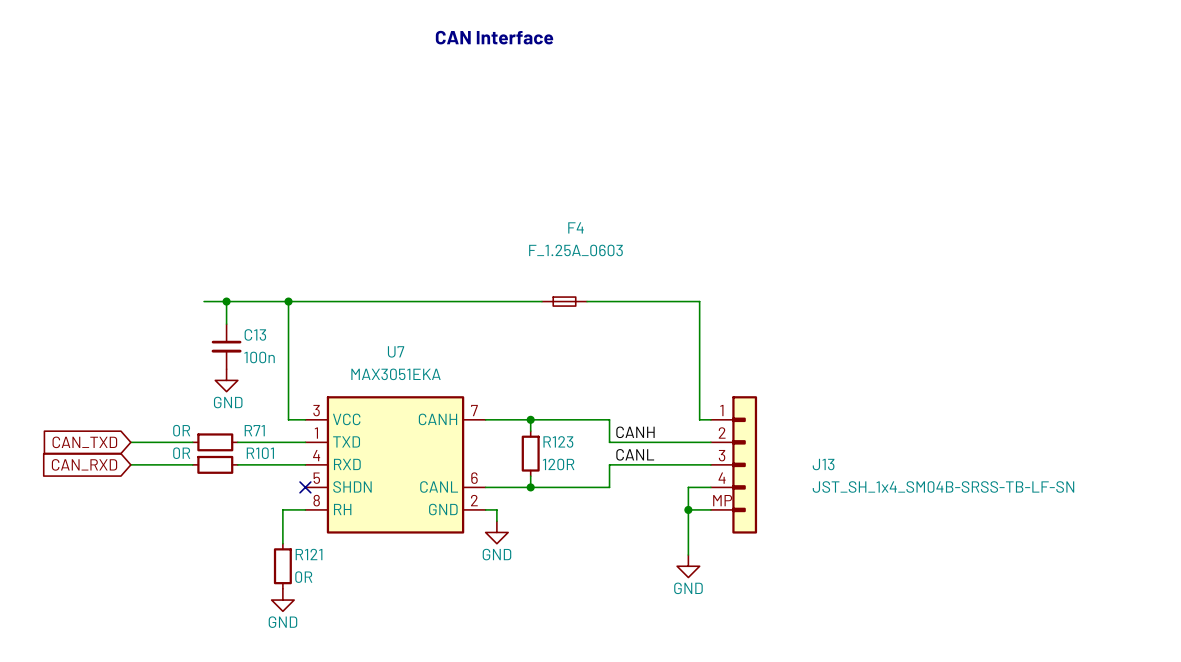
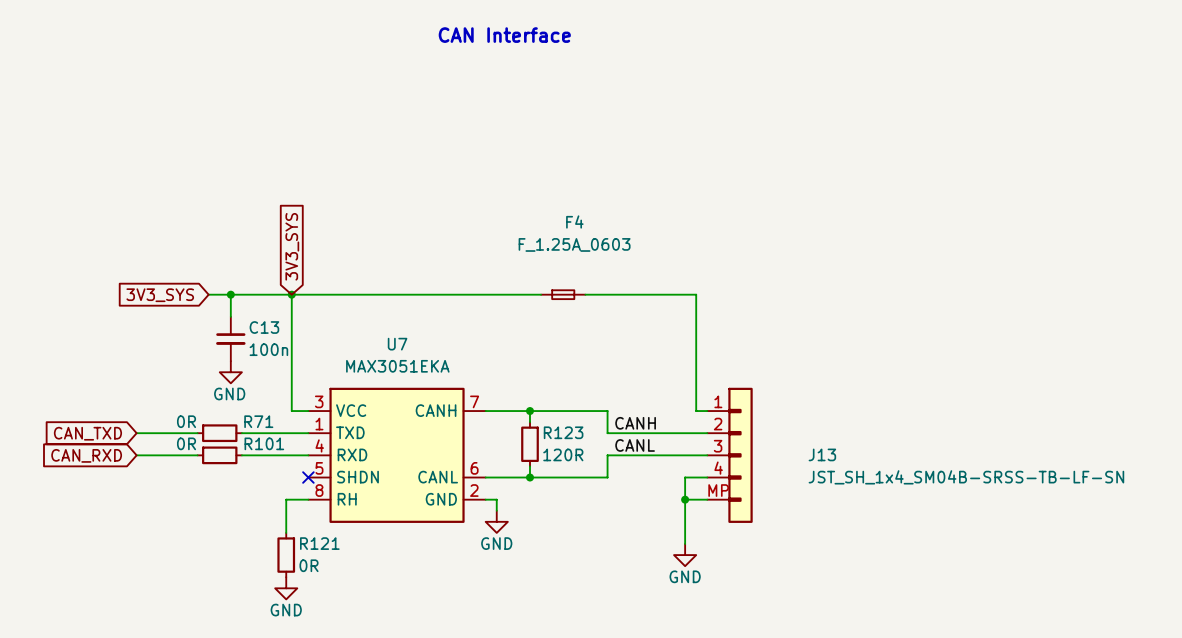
global label: none -> 3V3_SYS (292, 246)
global label: none -> 3V3_SYS (160, 295)

